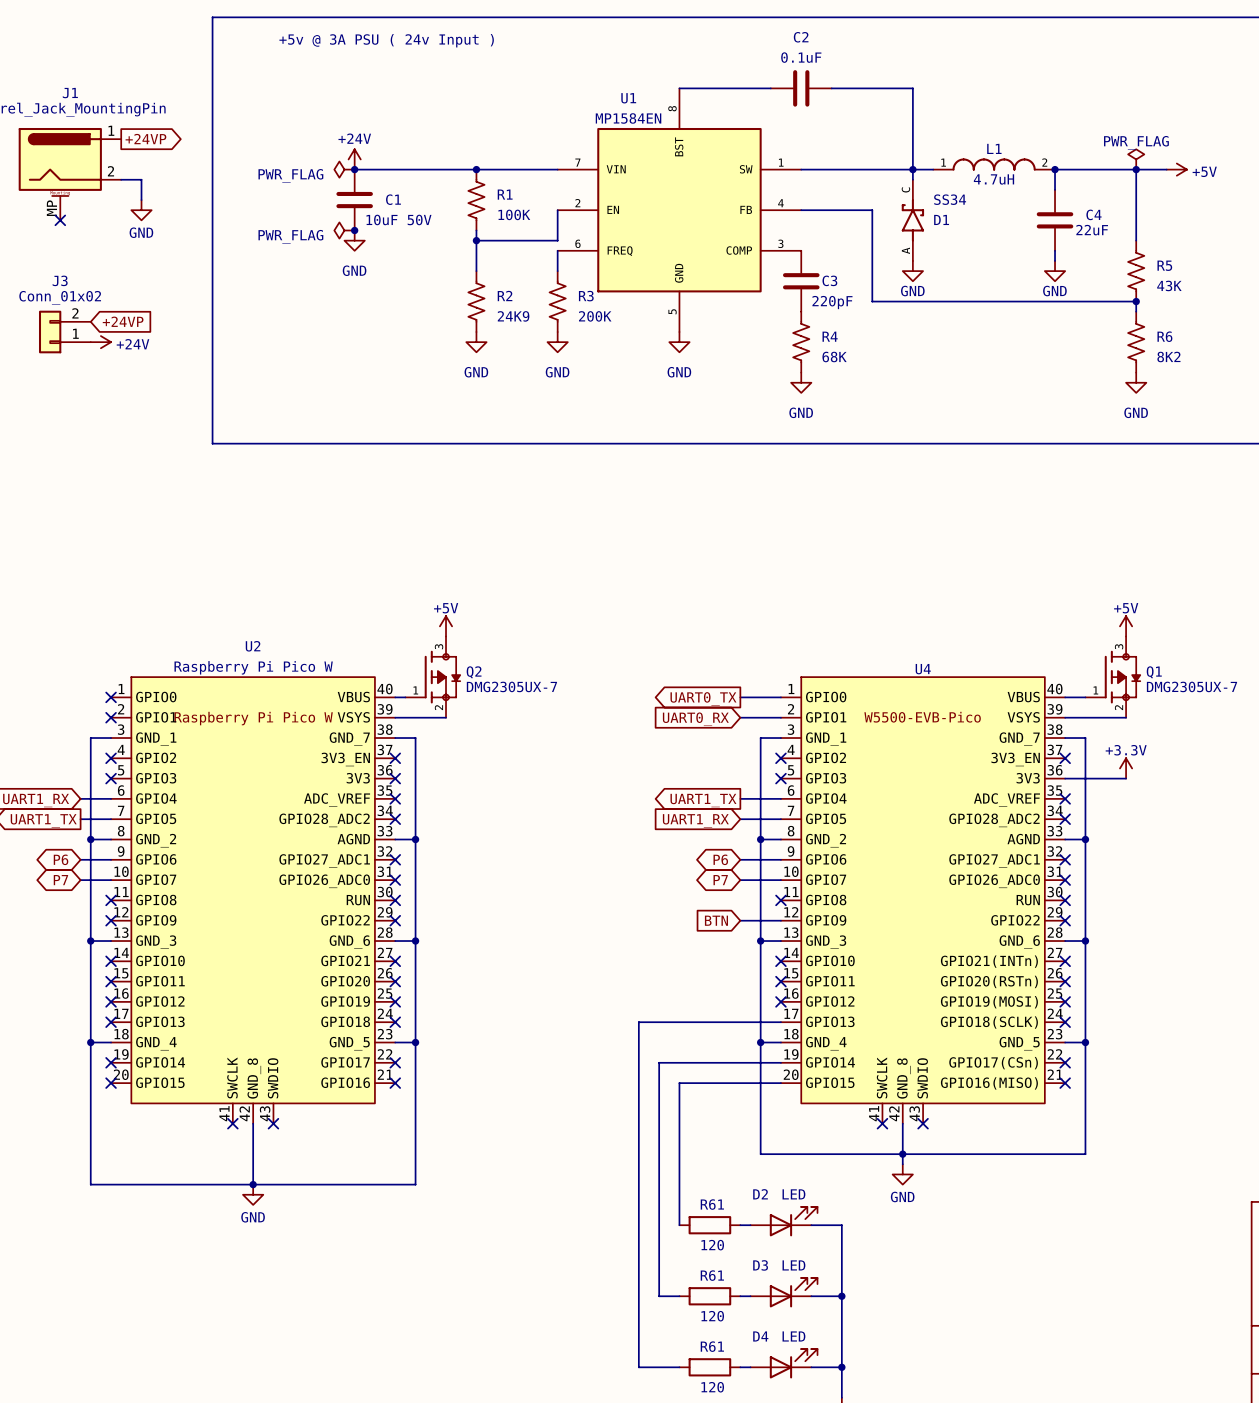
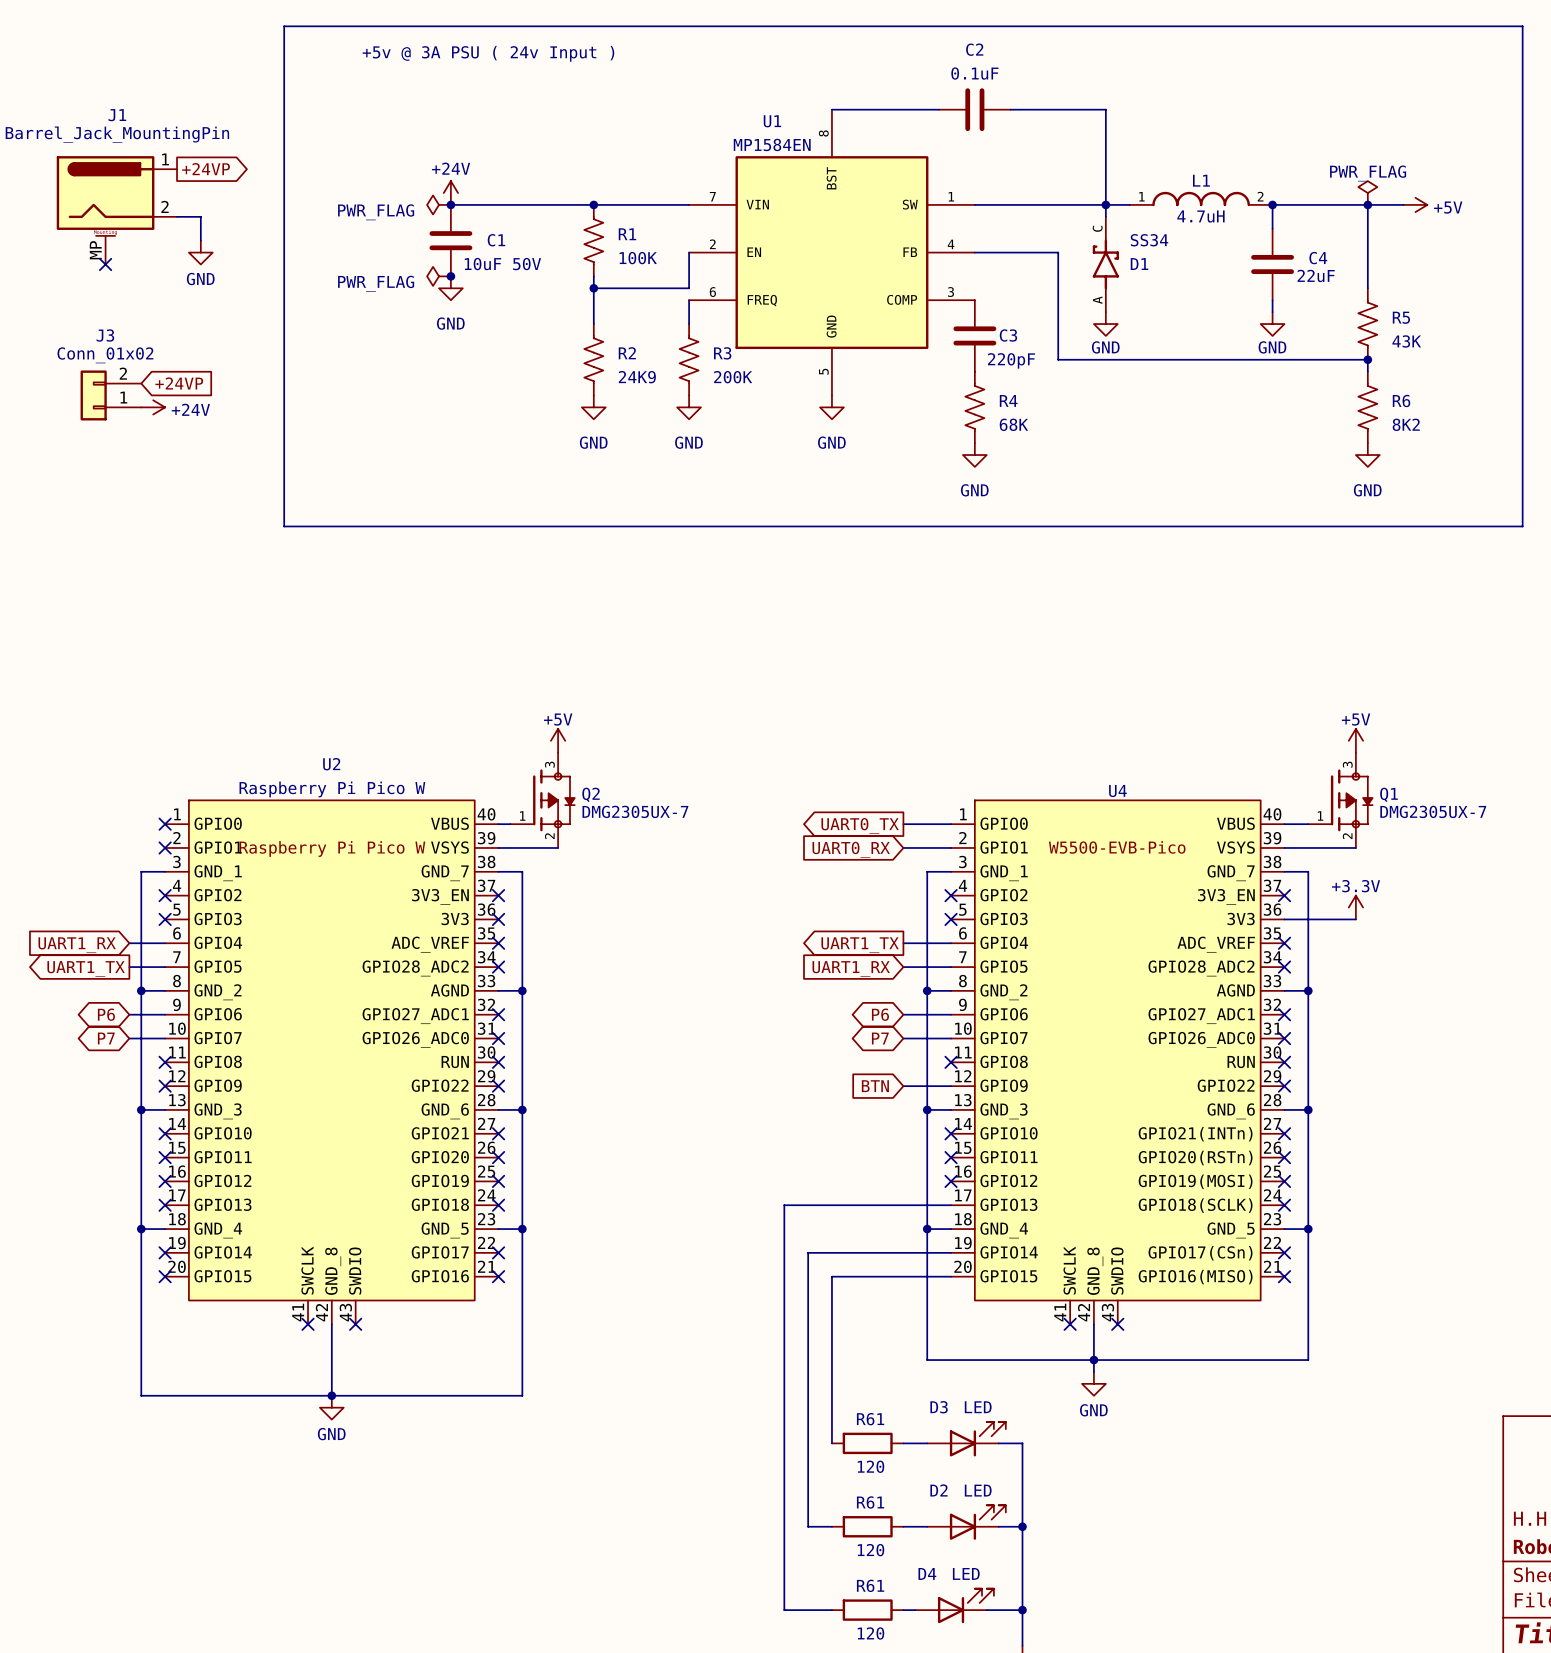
D2 position: (784, 1221) -> (966, 1522)
D3 position: (784, 1292) -> (966, 1439)

